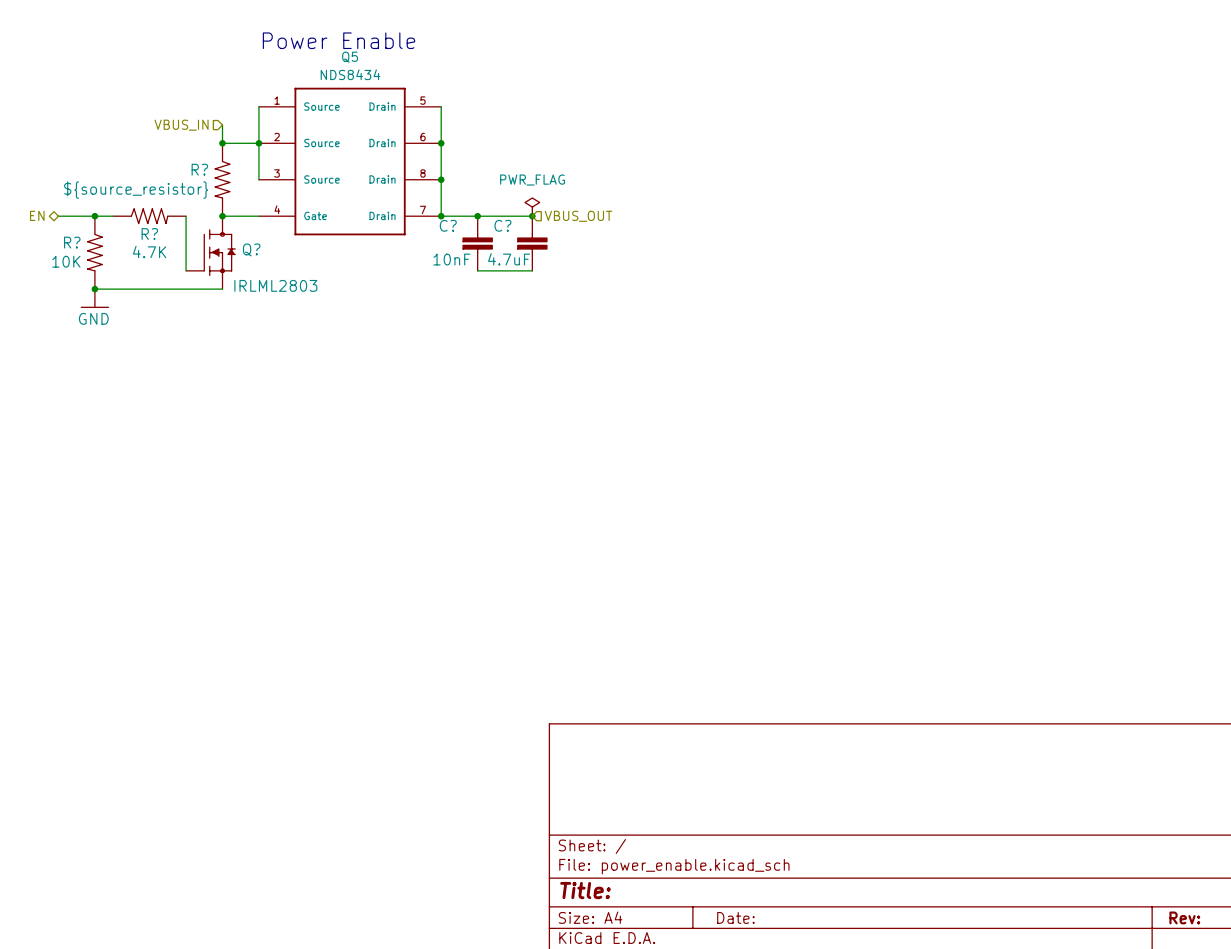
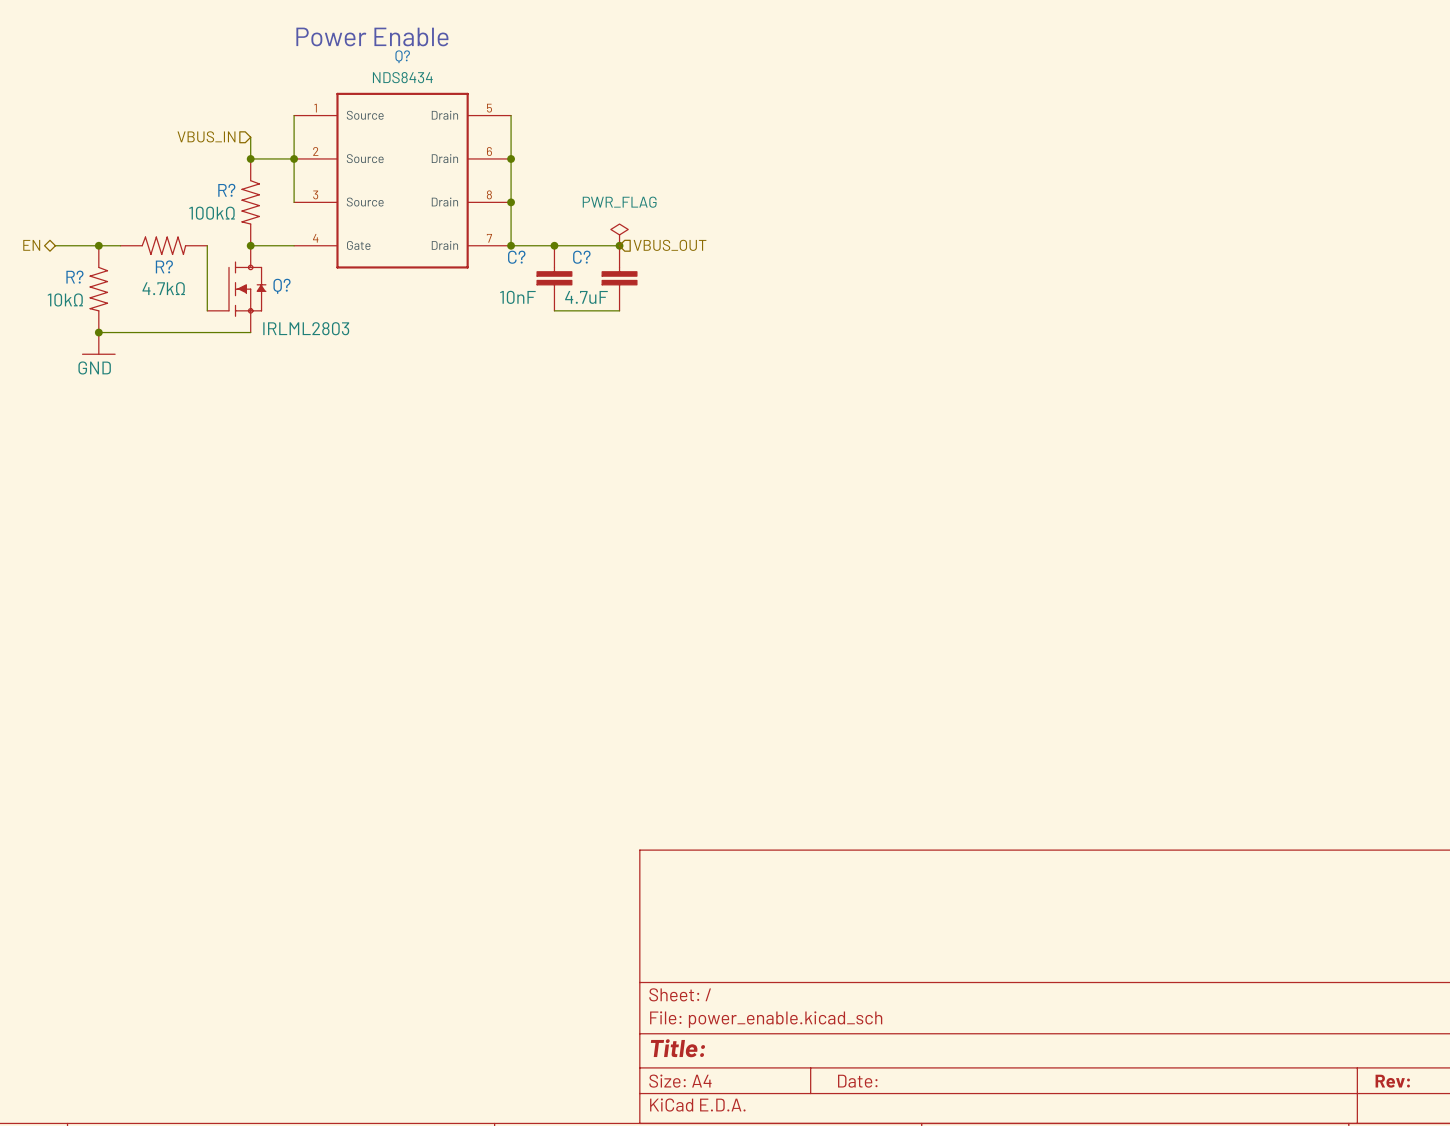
Q5 name: Q5 (350, 57) -> Q? (402, 56)
R? value: ${source_resistor} (136, 190) -> 100kΩ (212, 213)
R? value: 4.7K (149, 252) -> 4.7kΩ (163, 288)
R? value: 10K (66, 261) -> 10kΩ (65, 299)

